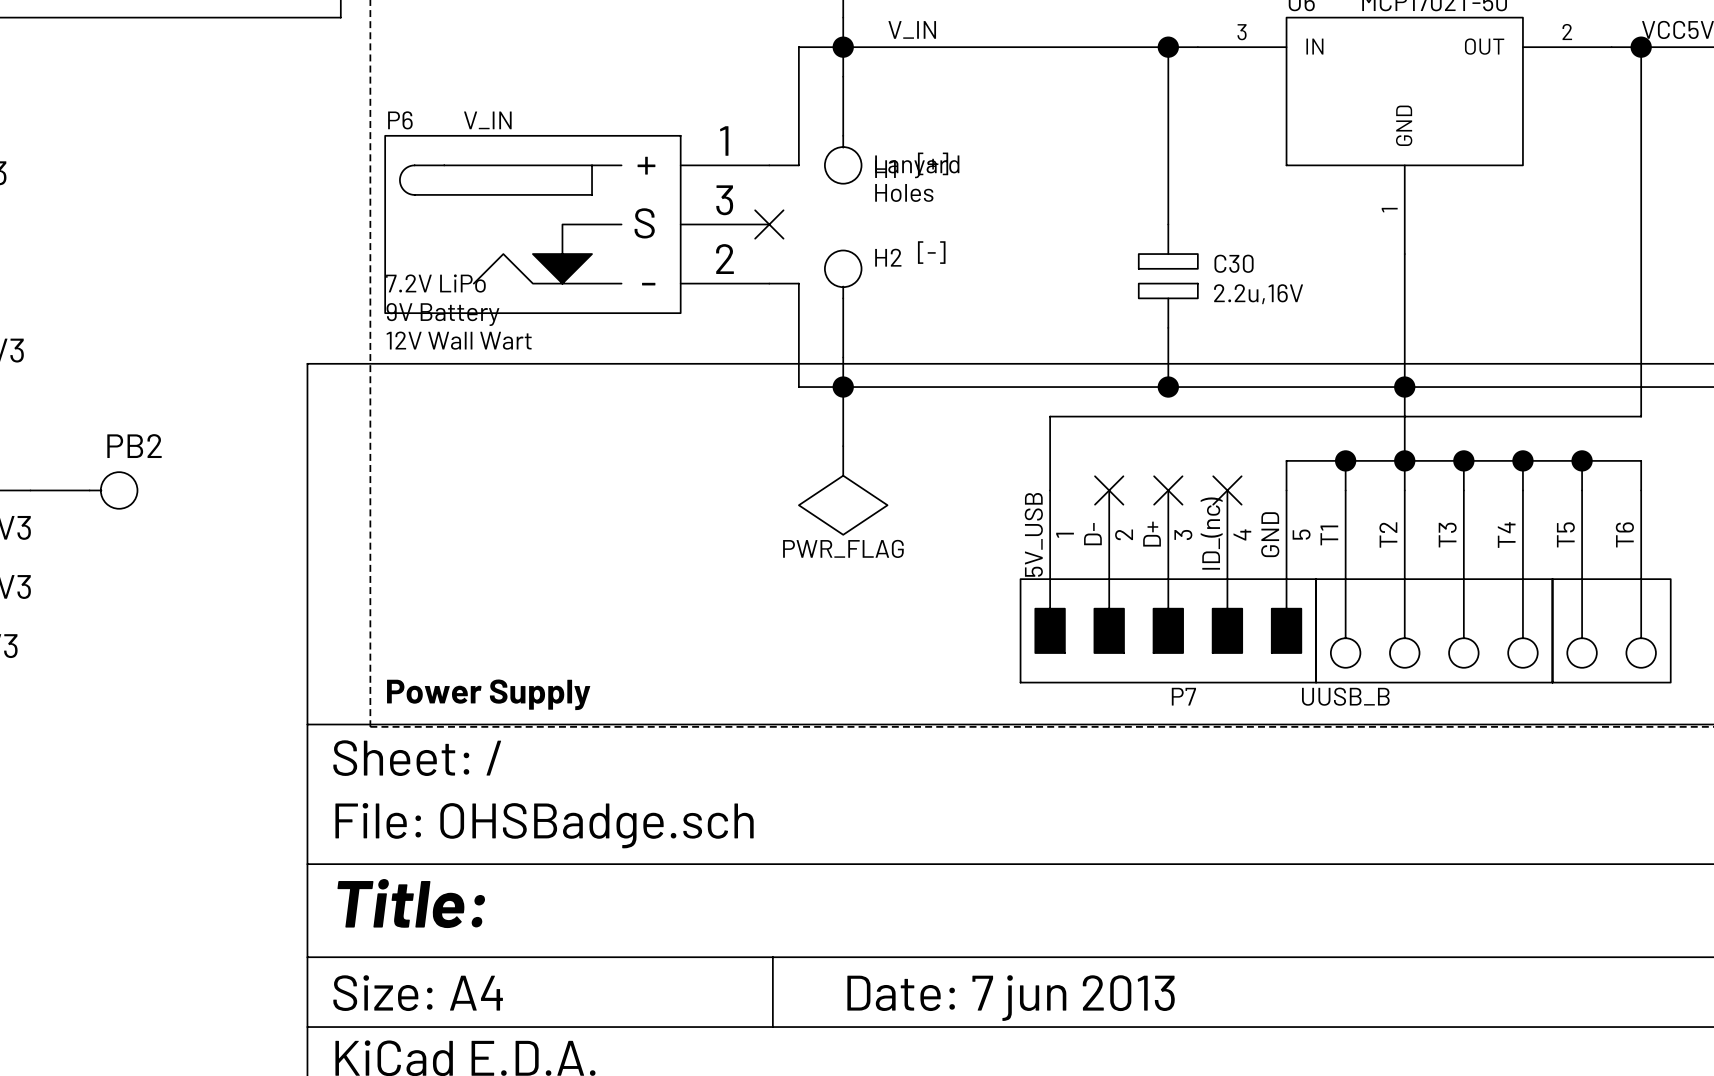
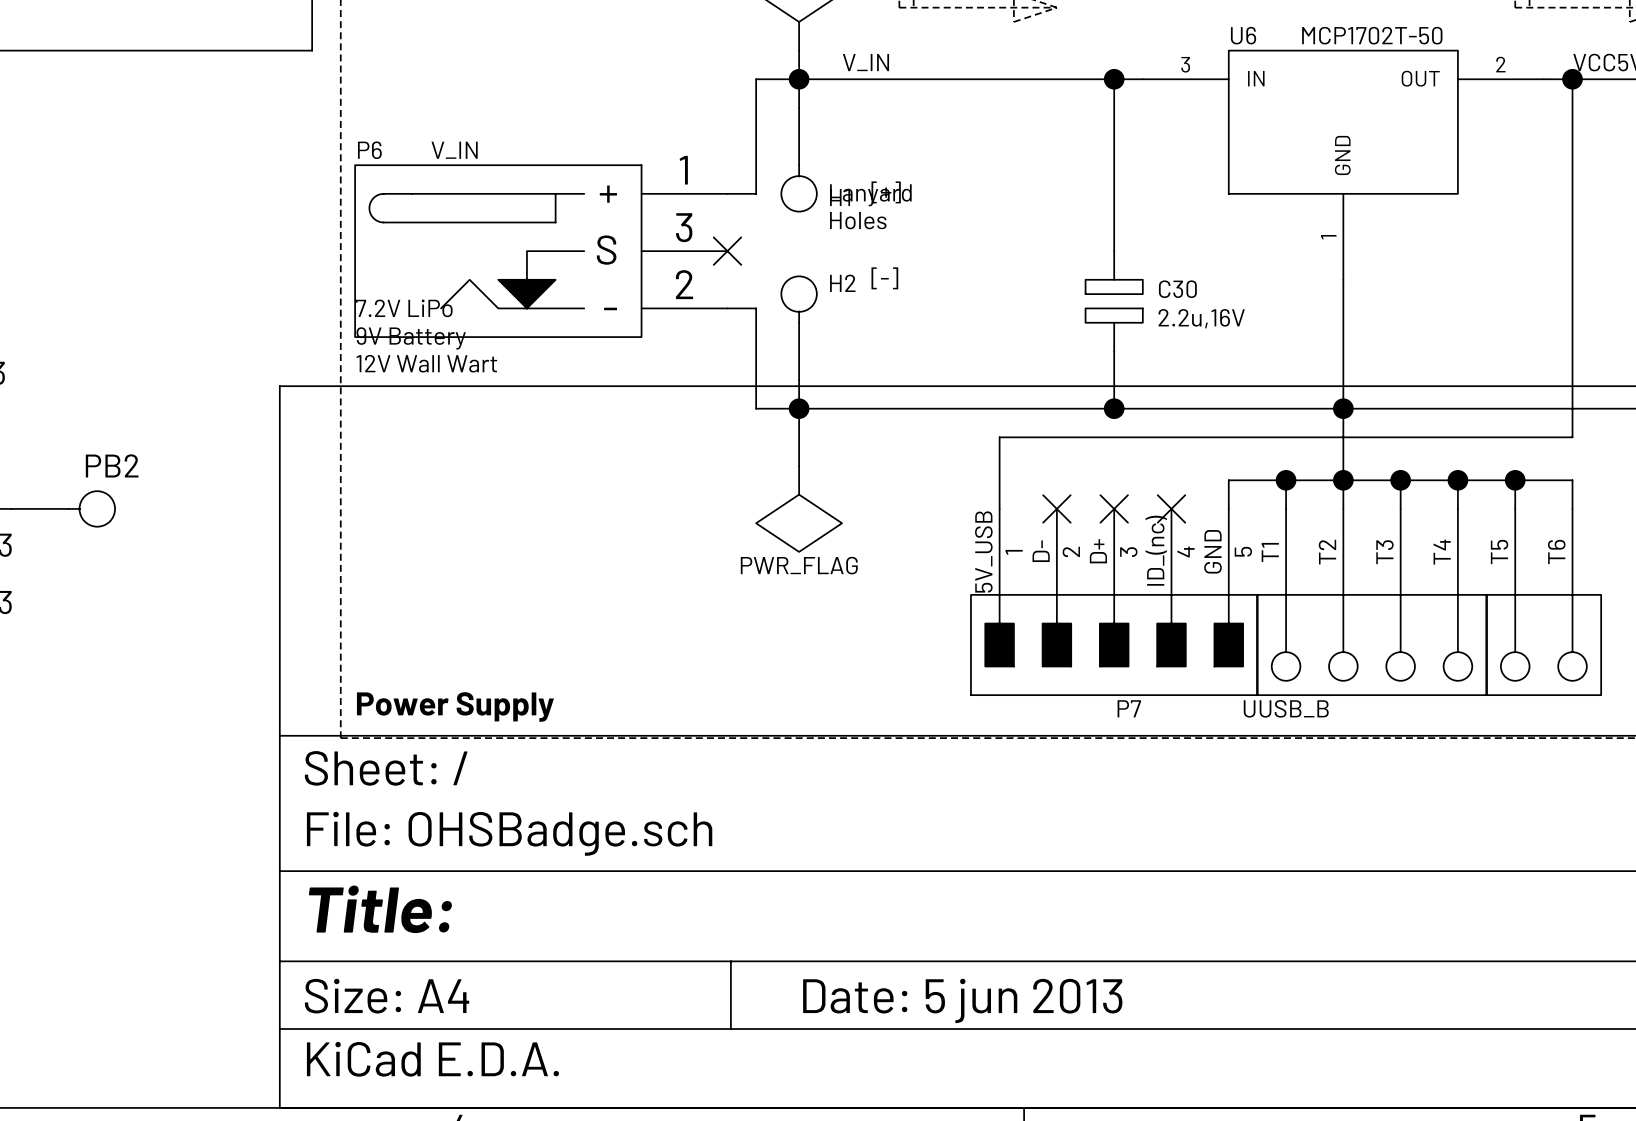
title block: Date: 7 jun 2013 (1011, 998) -> Date: 5 jun 2013 (962, 1000)

